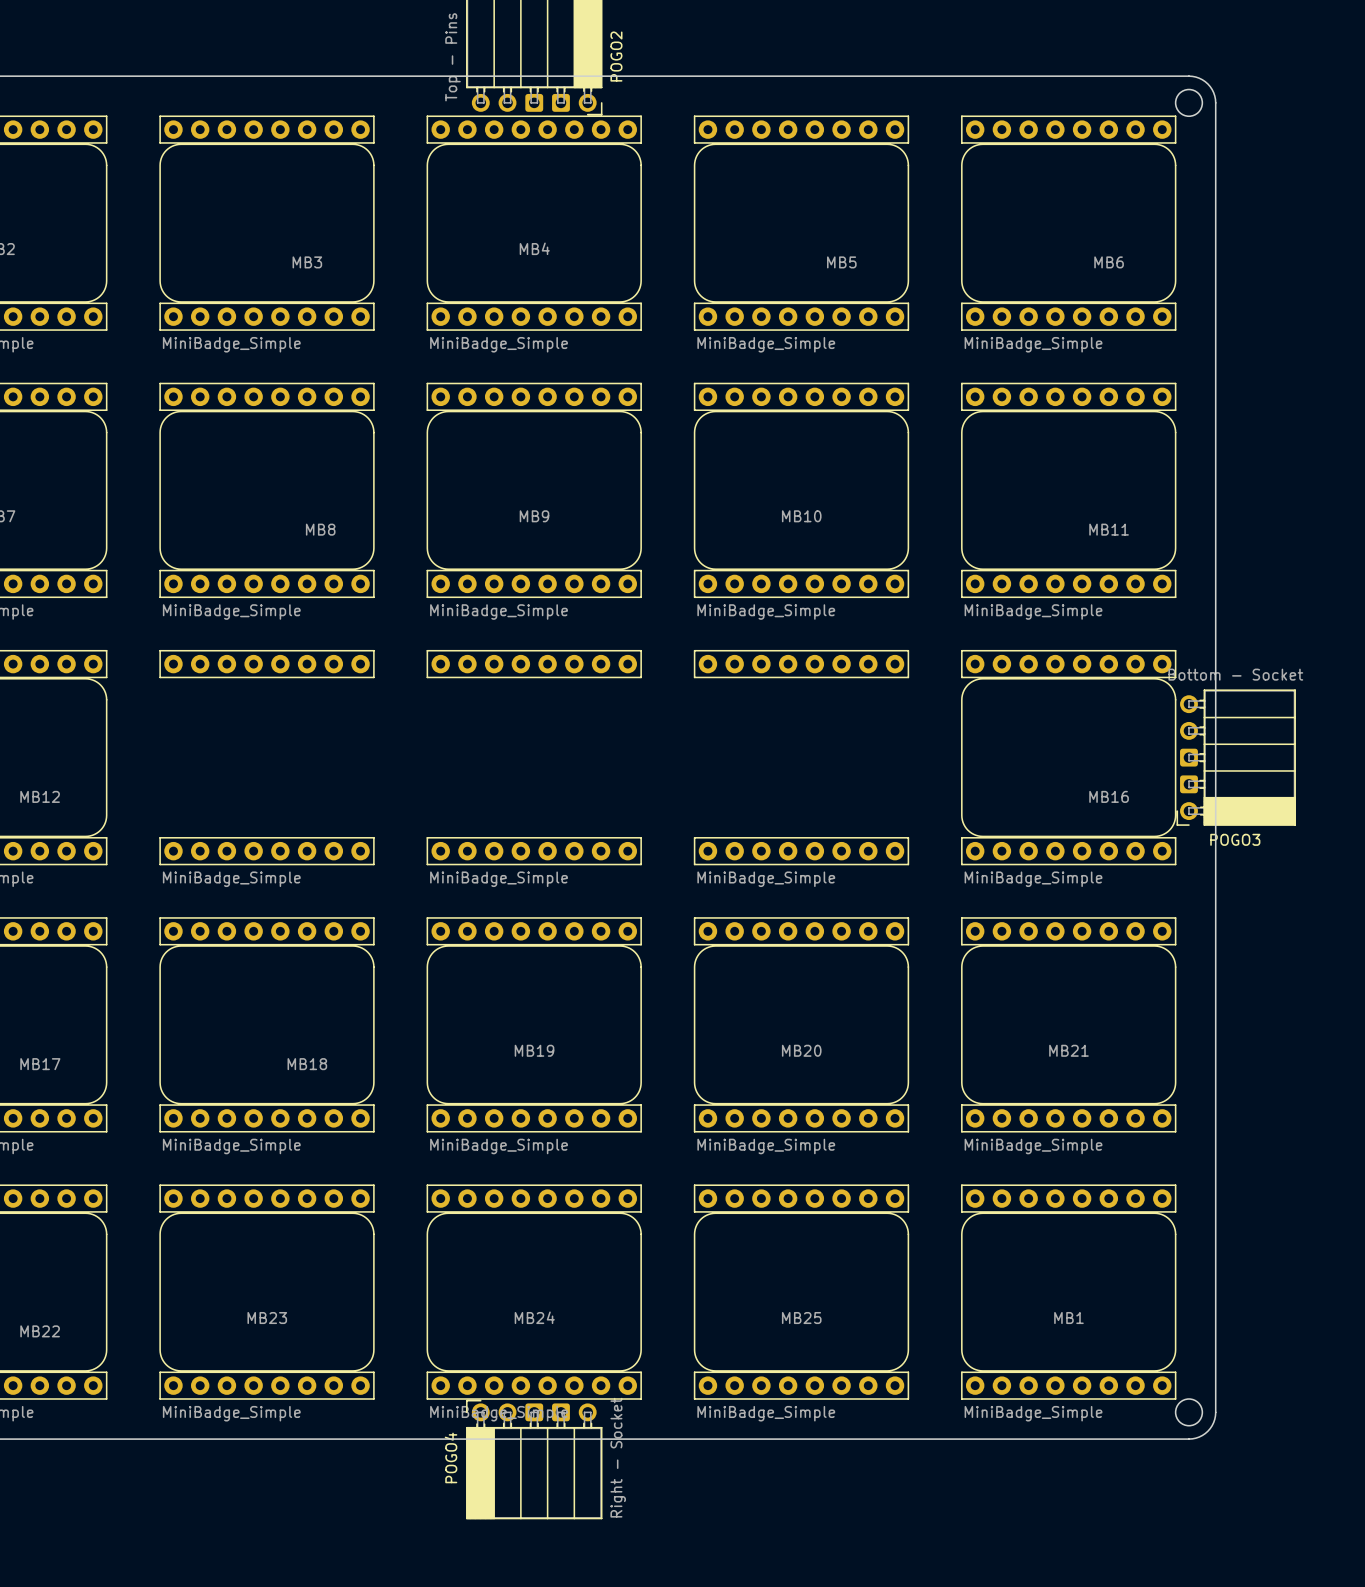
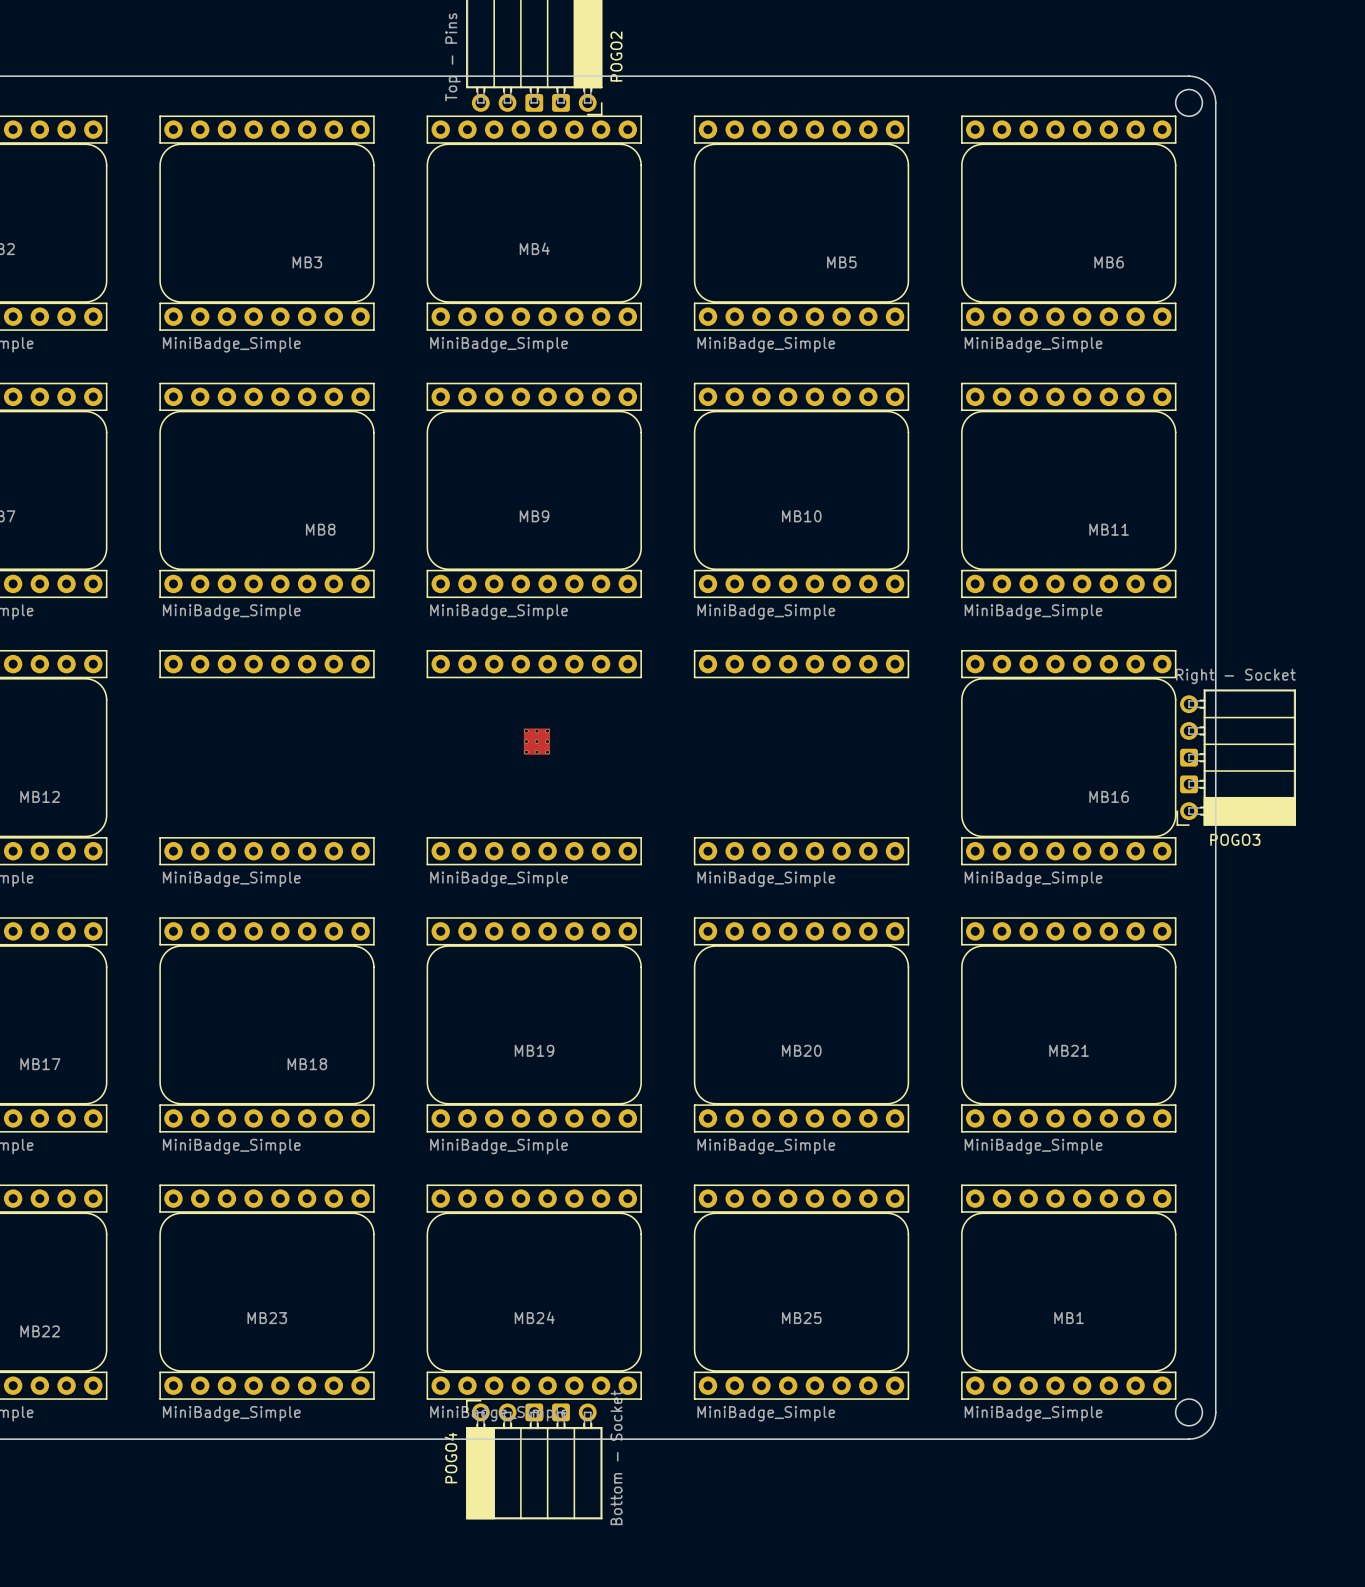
POGO3 value: Bottom - Socket (1235, 674) -> Right - Socket (1235, 676)
part: none -> (536, 741)
POGO4 value: Right - Socket (618, 1457) -> Bottom - Socket (616, 1457)

